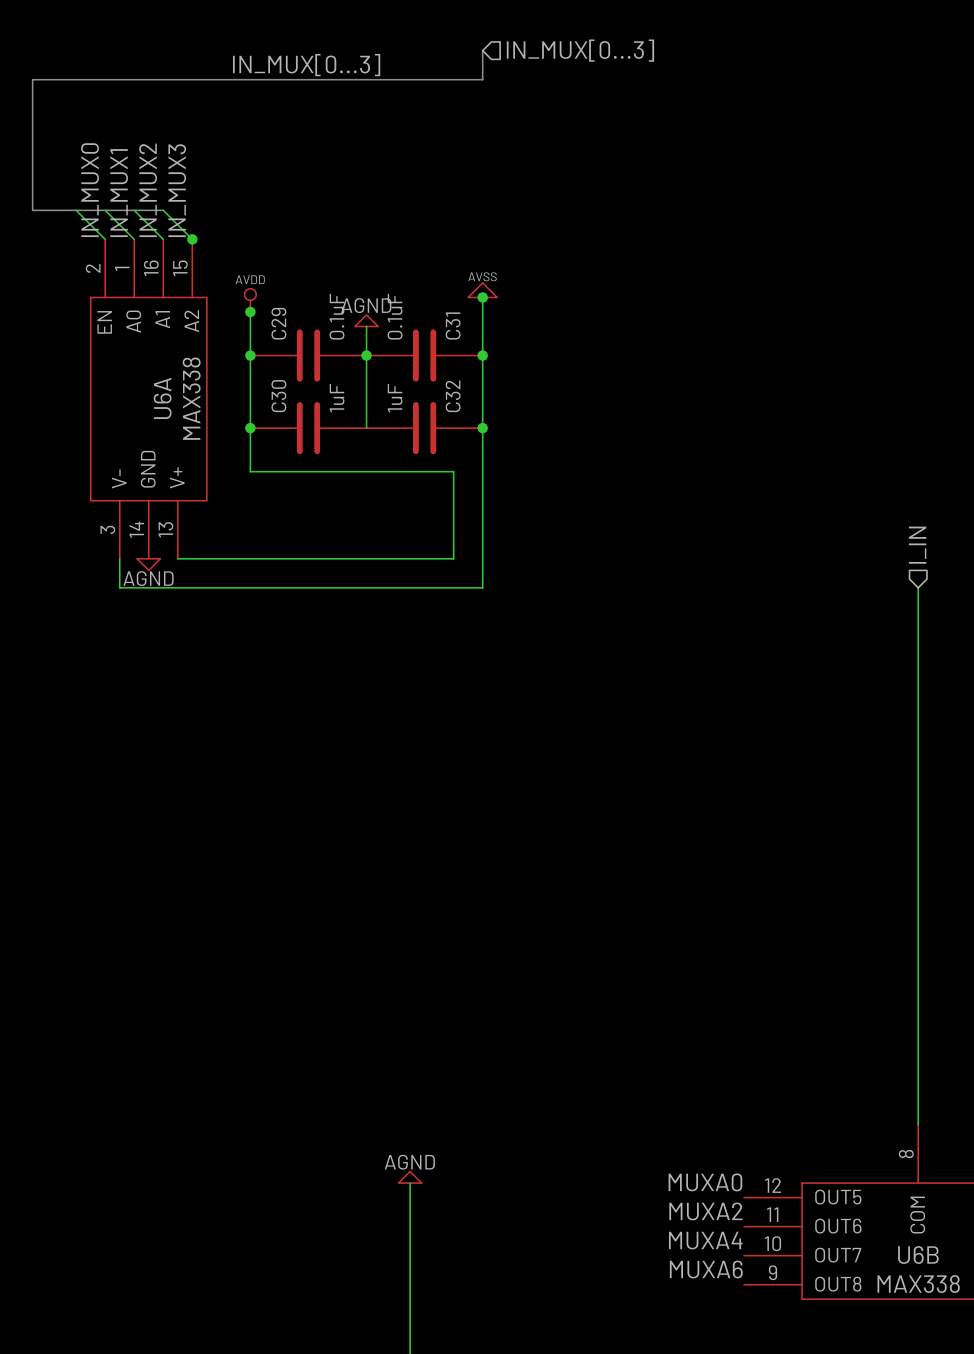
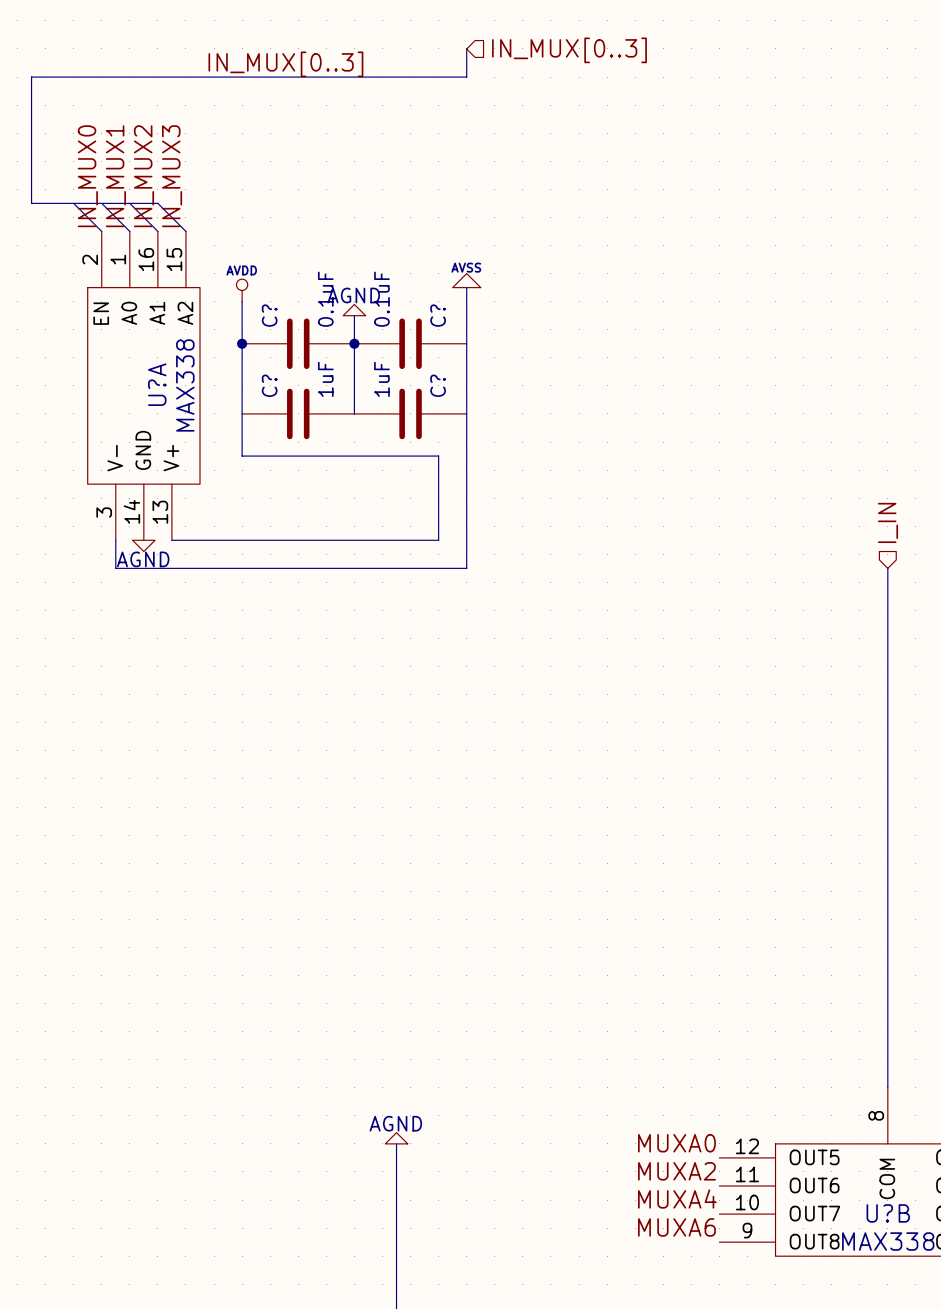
hierarchical label: IN_MUX[0...3] (580, 50) -> IN_MUX[0..3] (569, 50)
label: IN_MUX[0...3] (306, 65) -> IN_MUX[0..3] (285, 64)
junction: (192, 239) -> none
junction: (482, 297) -> none
junction: (250, 311) -> none
C29 name: C29 (278, 323) -> C? (269, 315)
C31 name: C31 (453, 325) -> C? (438, 315)
junction: (482, 355) -> none
C30 name: C30 (278, 396) -> C? (269, 385)
C32 name: C32 (453, 396) -> C? (438, 385)
U6A name: U6A (162, 398) -> U?A (157, 384)
junction: (250, 428) -> none
junction: (482, 428) -> none
U6B name: U6B (918, 1255) -> U?B (888, 1213)

